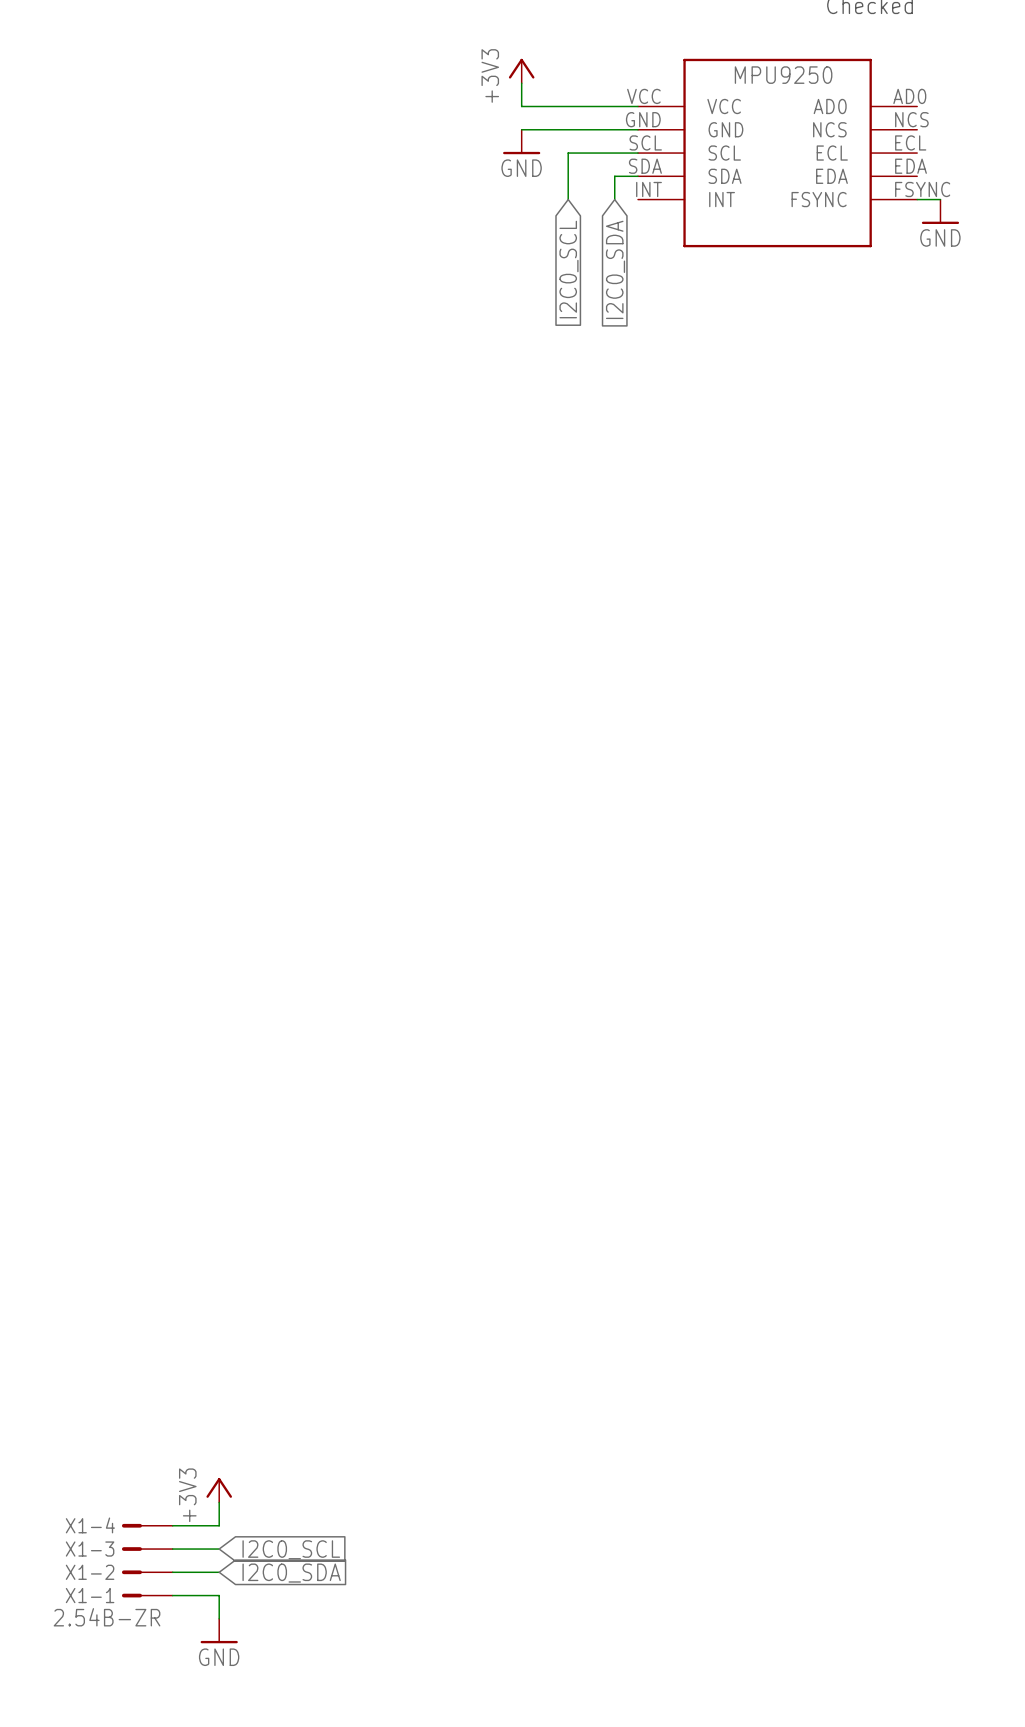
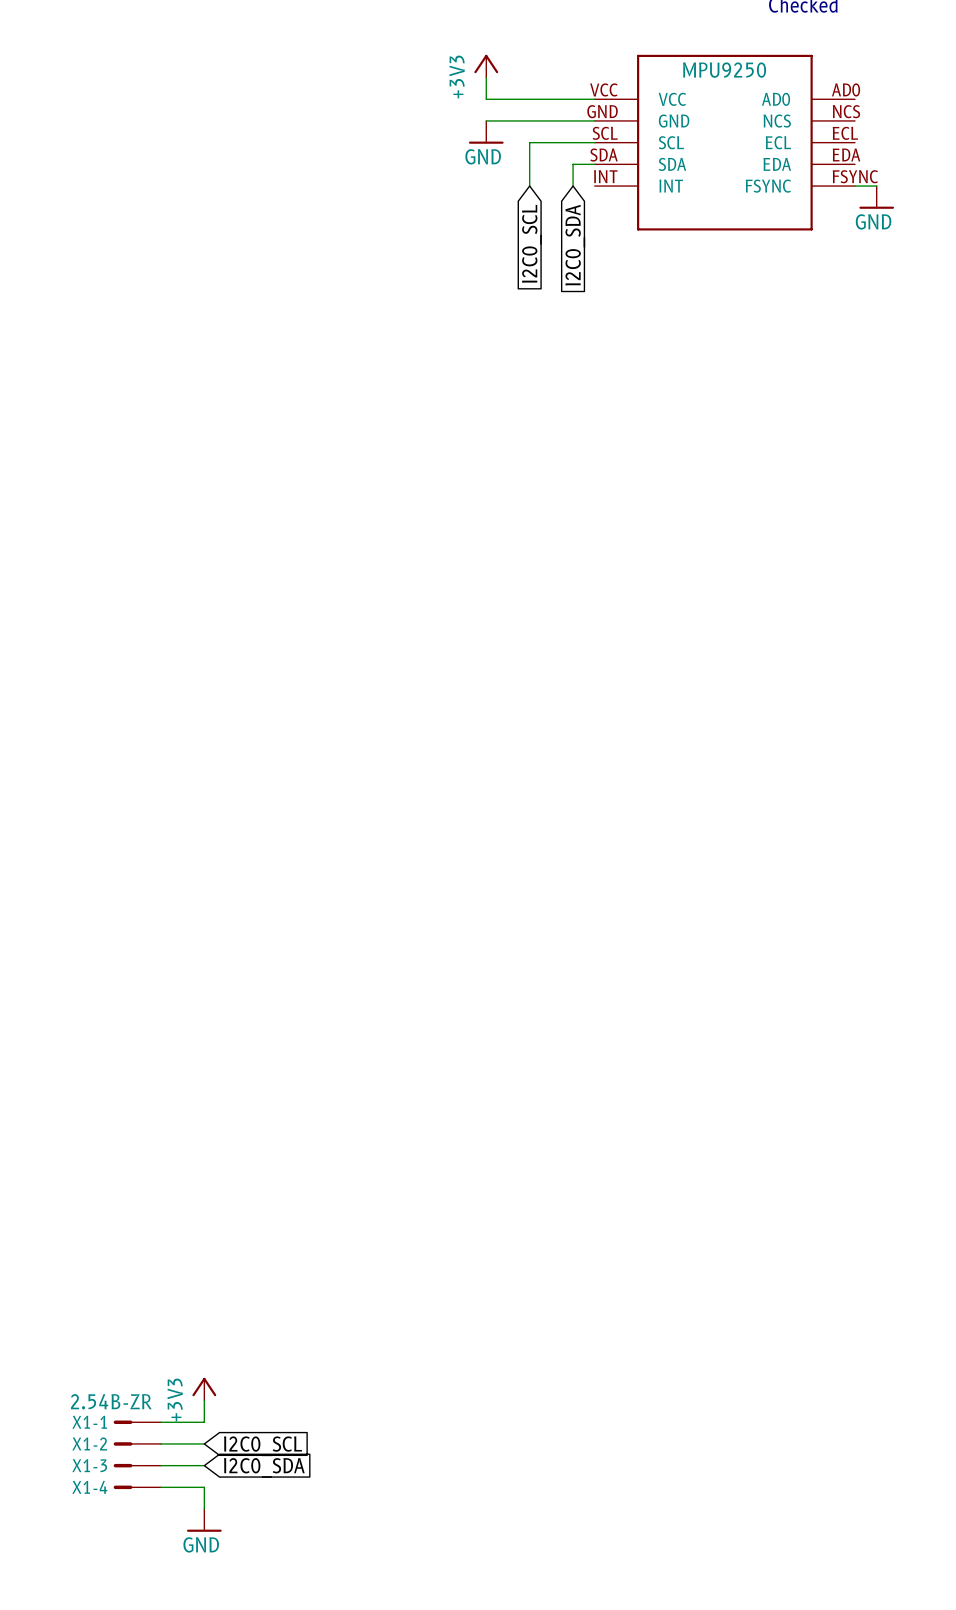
X1-4 value: none -> 2.54B-ZR (111, 1401)
X1-4 name: X1-4 (90, 1525) -> X1-1 (89, 1422)
X1-3 name: X1-3 (90, 1549) -> X1-2 (89, 1443)
X1-2 name: X1-2 (90, 1572) -> X1-3 (89, 1465)
X1-1 name: X1-1 (90, 1595) -> X1-4 (89, 1487)
X1-1 value: 2.54B-ZR (107, 1617) -> none

